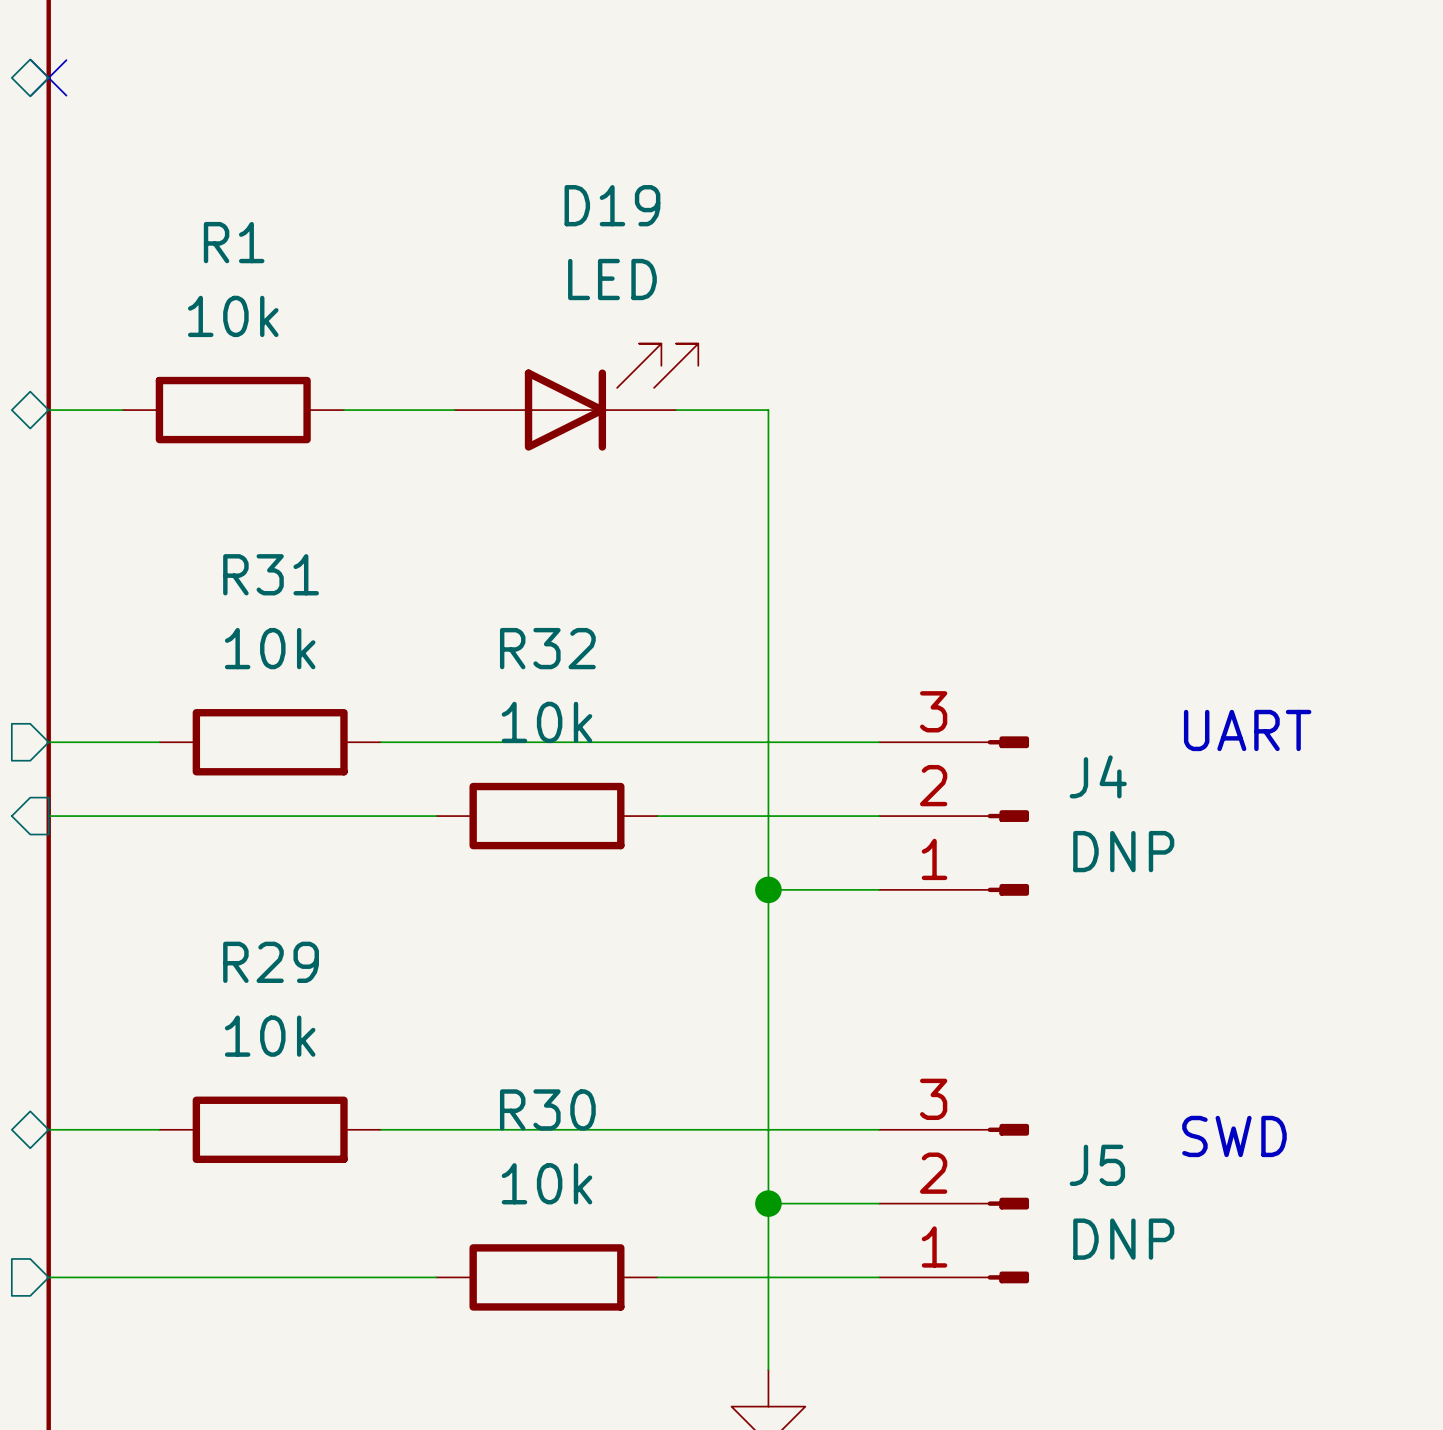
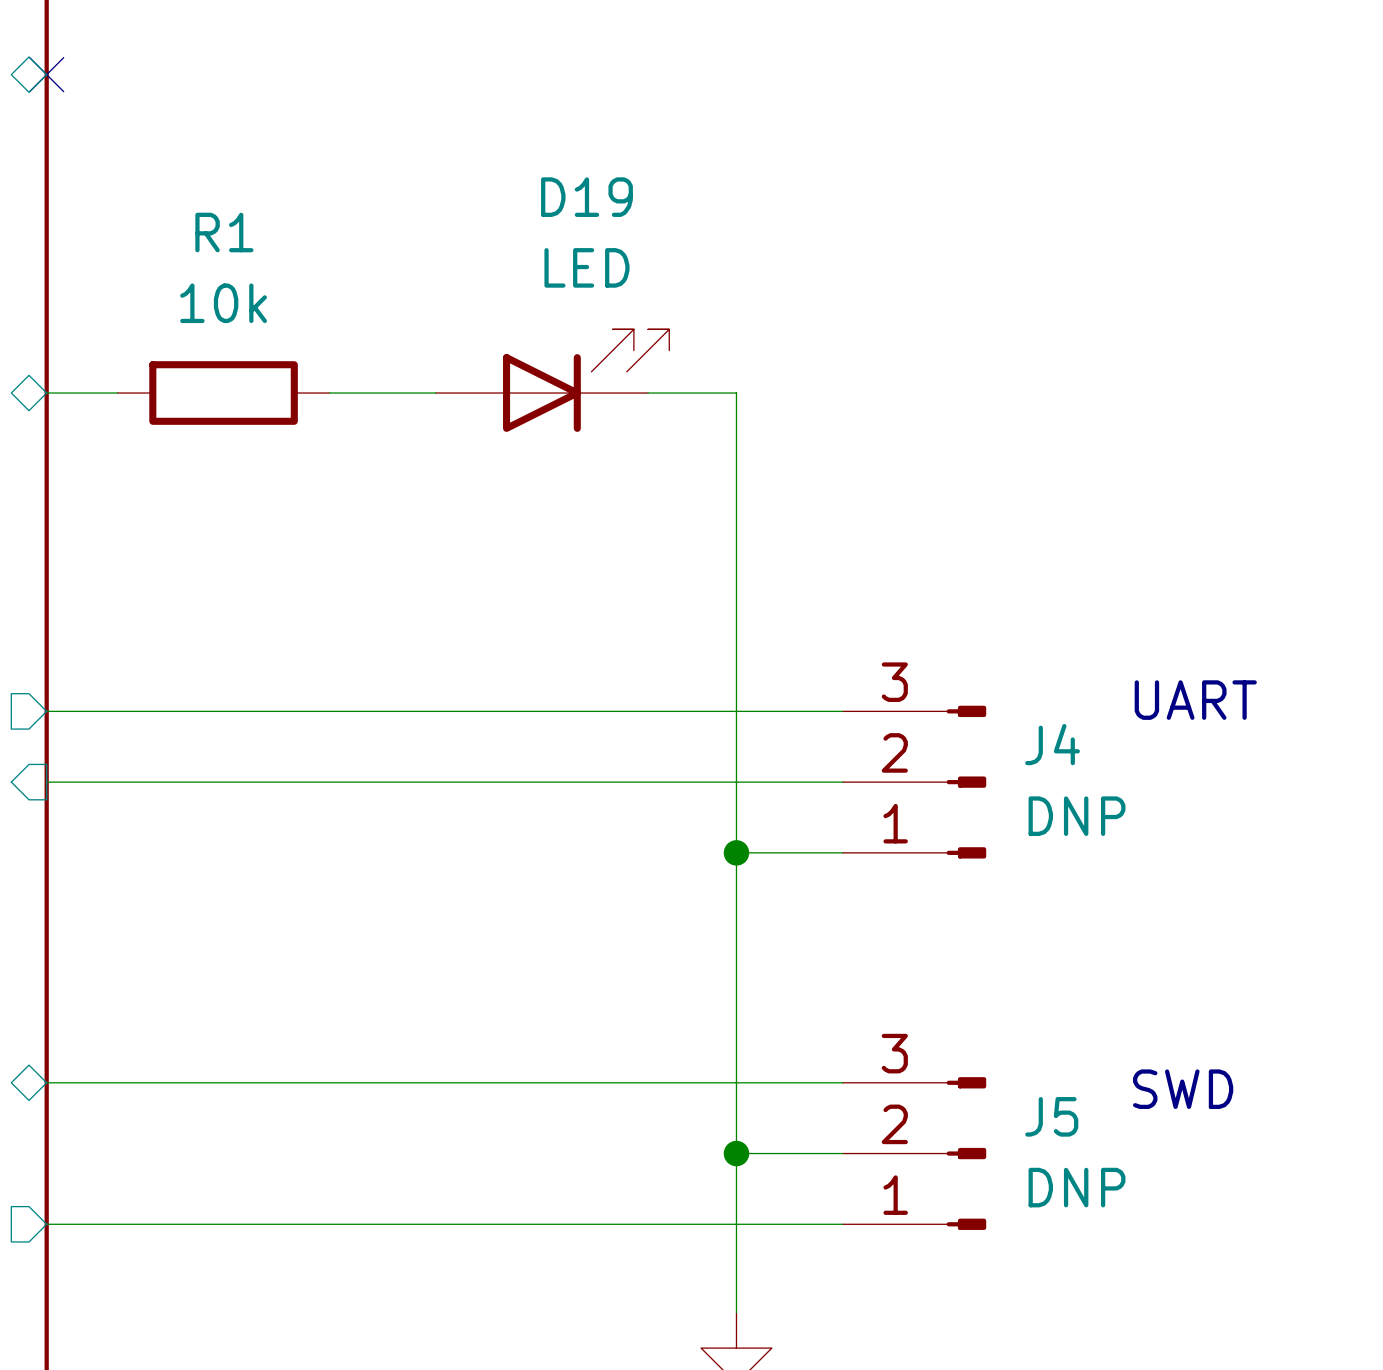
wire: none -> (152, 711) (365, 711)
R31: 10k (270, 742) -> none
wire: none -> (418, 782) (630, 782)
R32: 10k (546, 816) -> none
wire: none -> (152, 1082) (365, 1082)
R29: 10k (270, 1129) -> none
wire: none -> (418, 1224) (630, 1224)
R30: 10k (546, 1277) -> none

